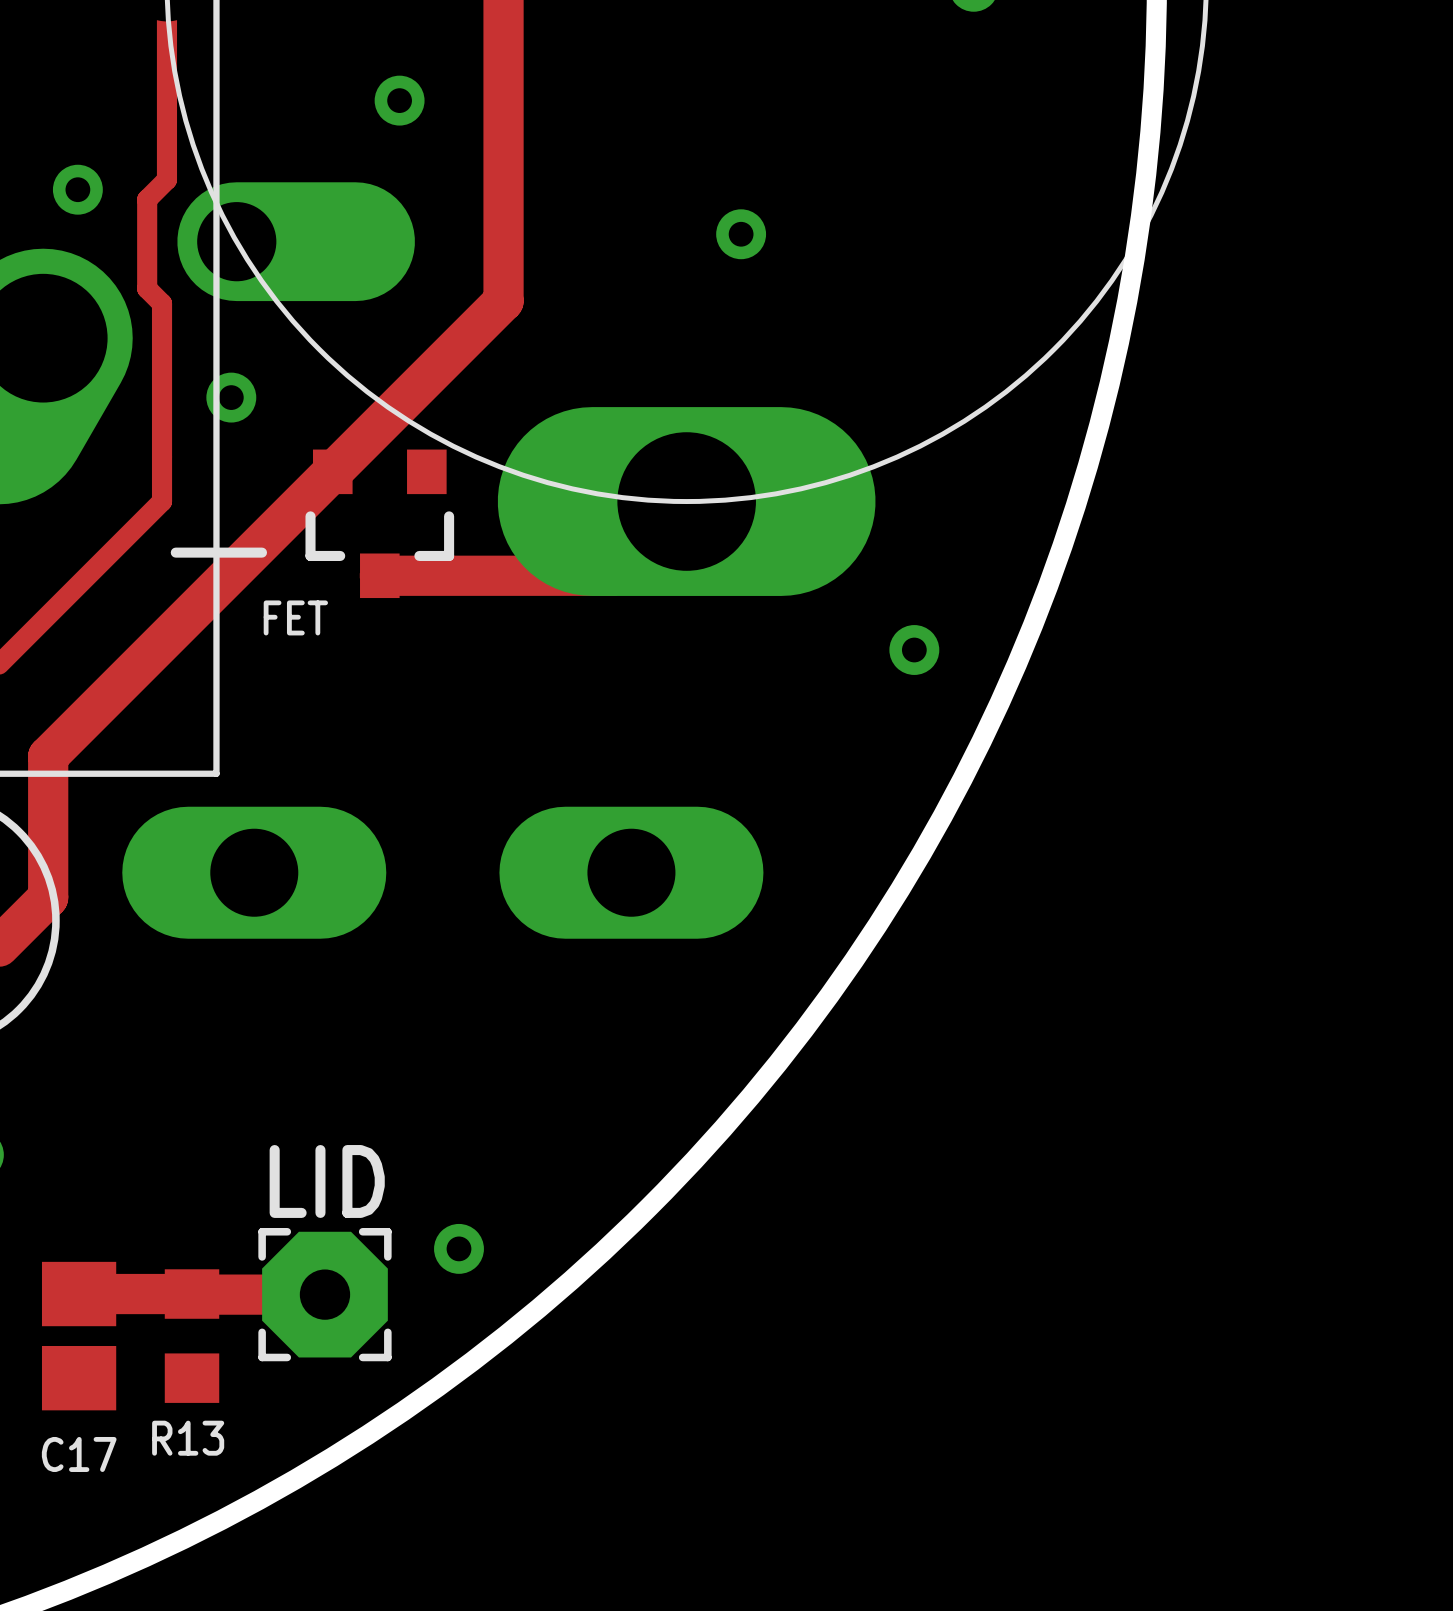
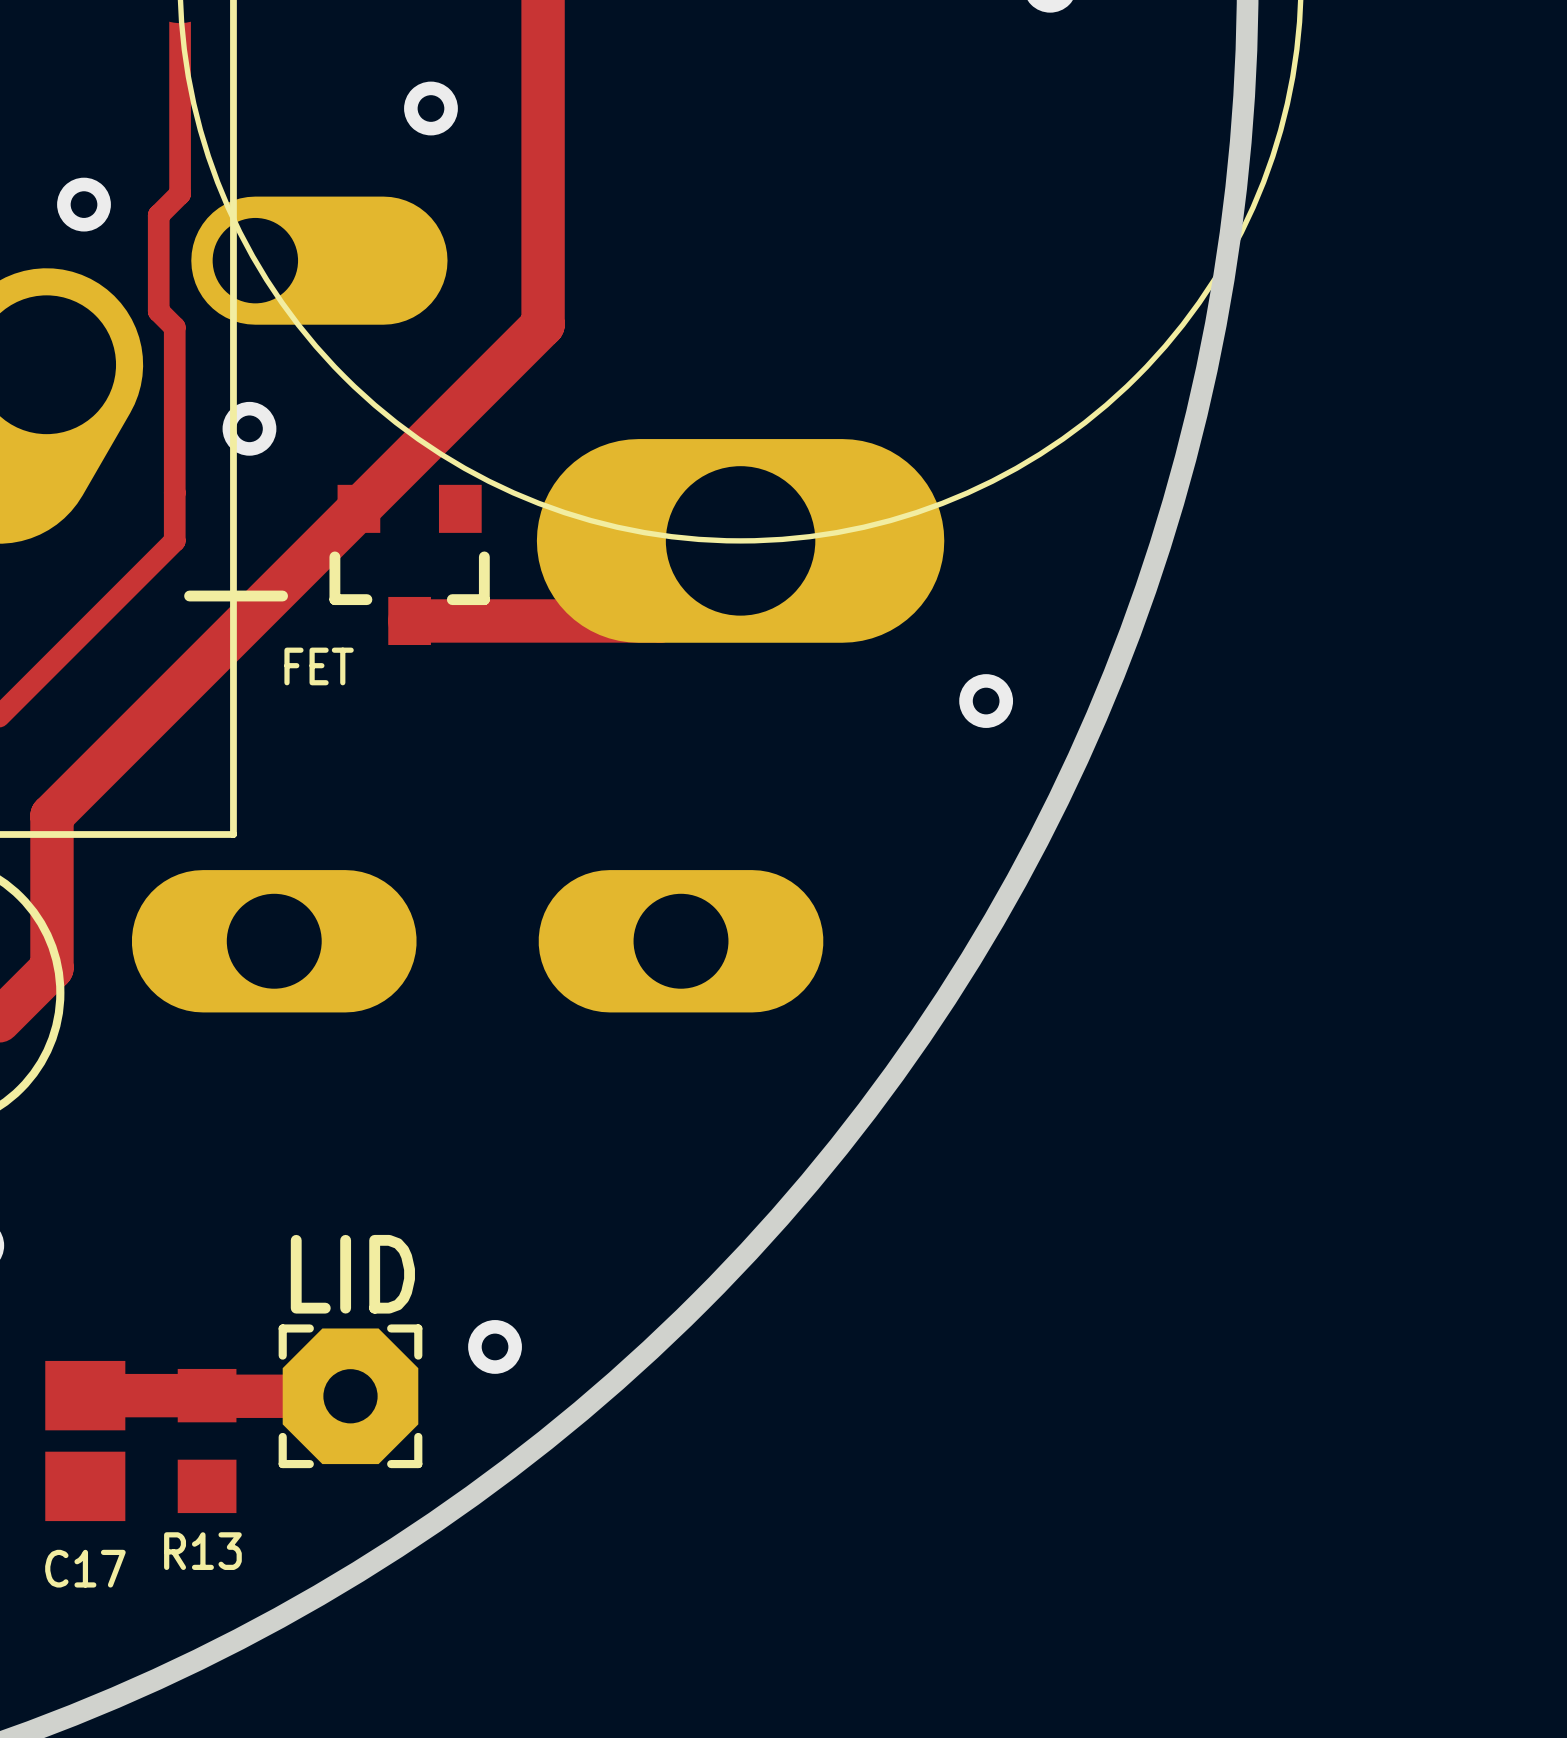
via: (741, 234) -> none

